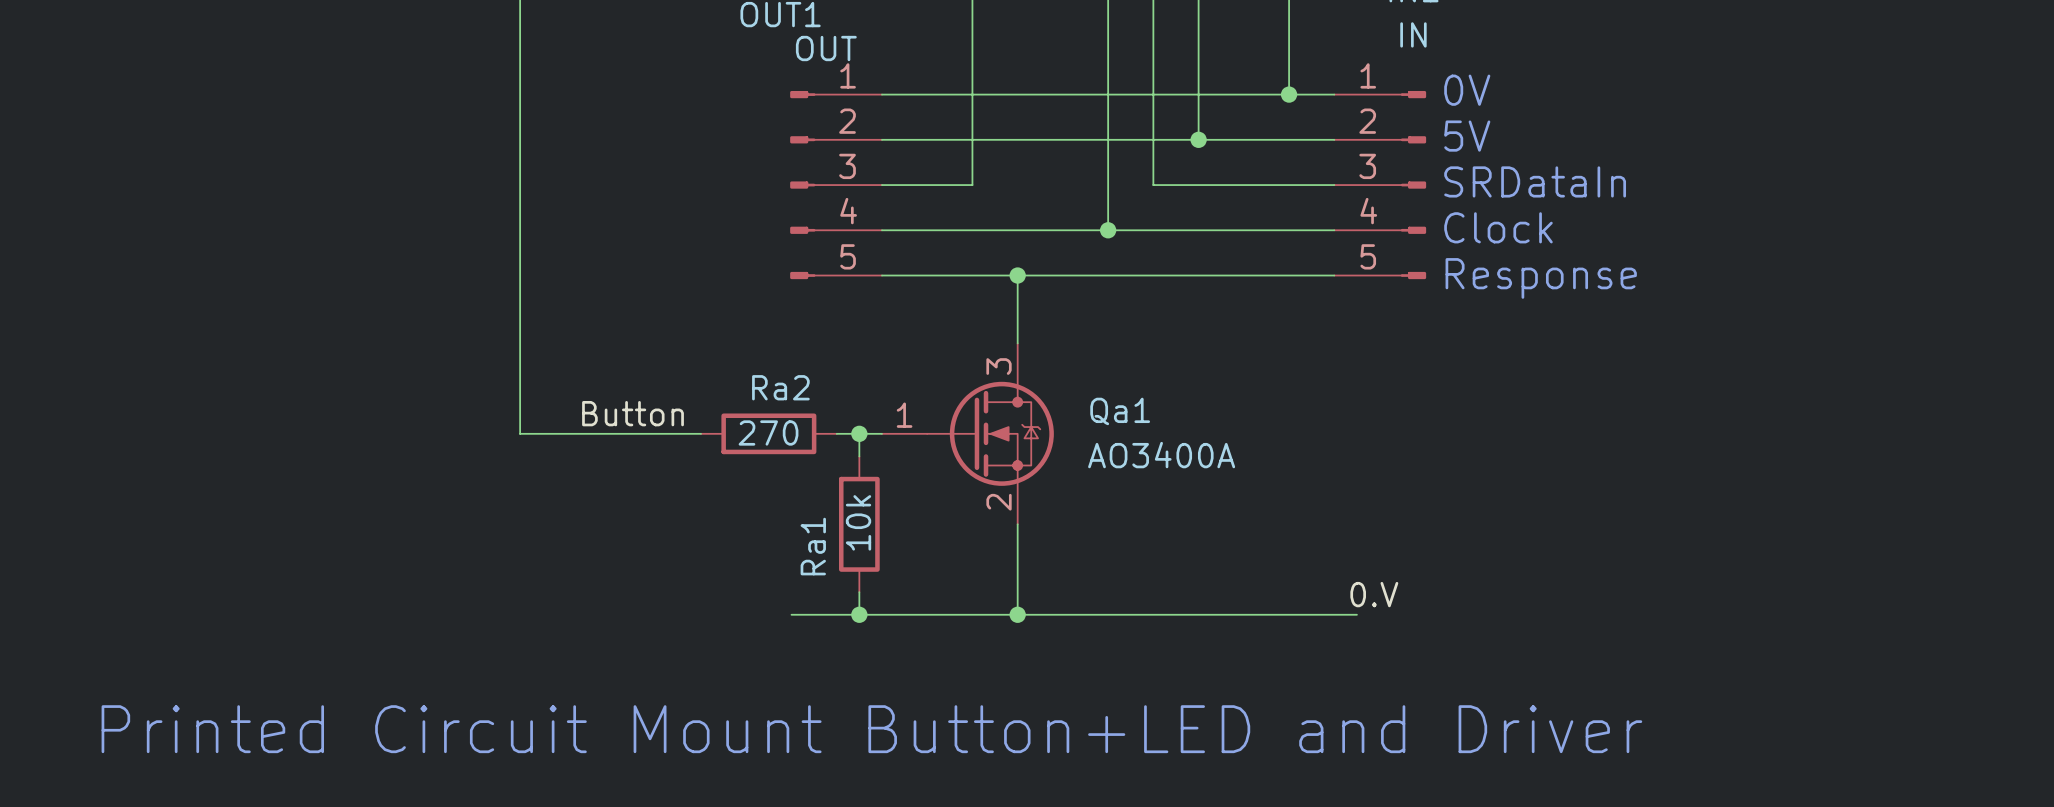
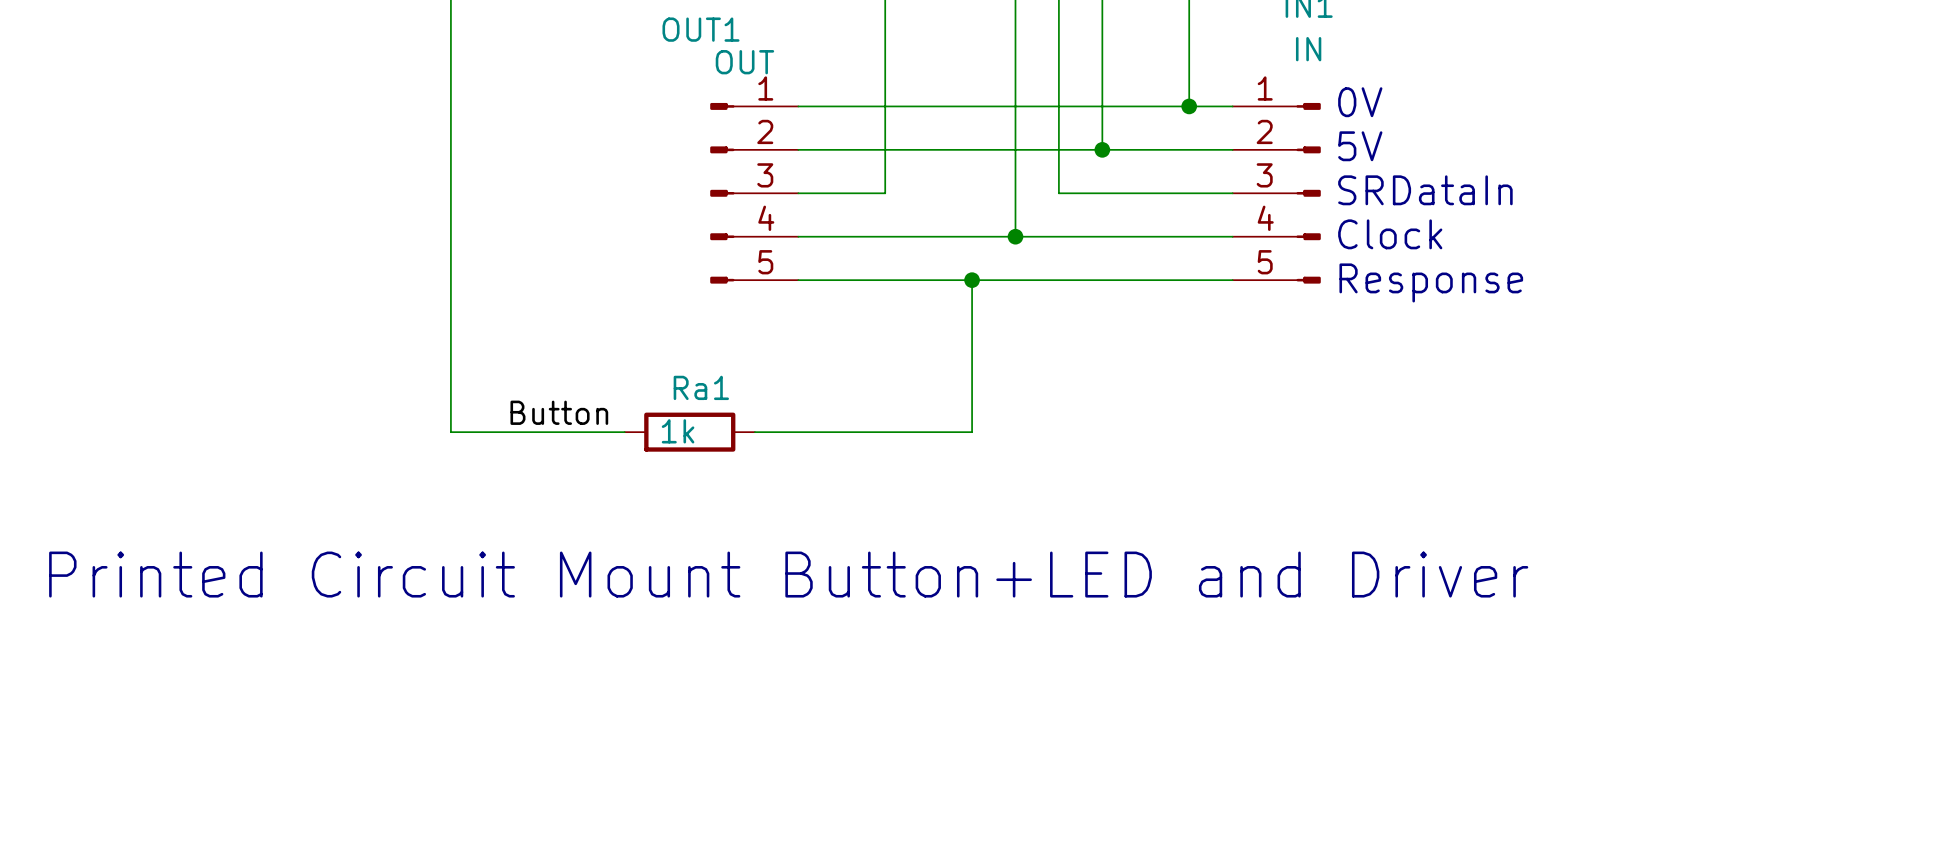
wire: (1017, 275) (1017, 343) -> none
junction position: (1017, 275) -> (972, 280)
wire: none -> (972, 280) (972, 432) (798, 432)
Ra2 name: Ra2 (780, 387) -> Ra1 (701, 387)
Ra2 value: 270 (768, 432) -> 1k (678, 431)
wire: (859, 433) (859, 456) -> none
junction: (859, 433) -> none
Qa1: AO3400A (967, 433) -> none
Ra1: 10k (859, 524) -> none
wire: (1017, 524) (1017, 614) -> none
wire: (859, 592) (859, 614) -> none
label: 0.V (1374, 594) -> none
wire: (791, 614) (1356, 614) -> none
junction: (859, 614) -> none
junction: (1017, 614) -> none
text position: Printed Circuit Mount Button+LED and Driver (871, 729) -> Printed Circuit Mount Button+LED and Driver (788, 574)

